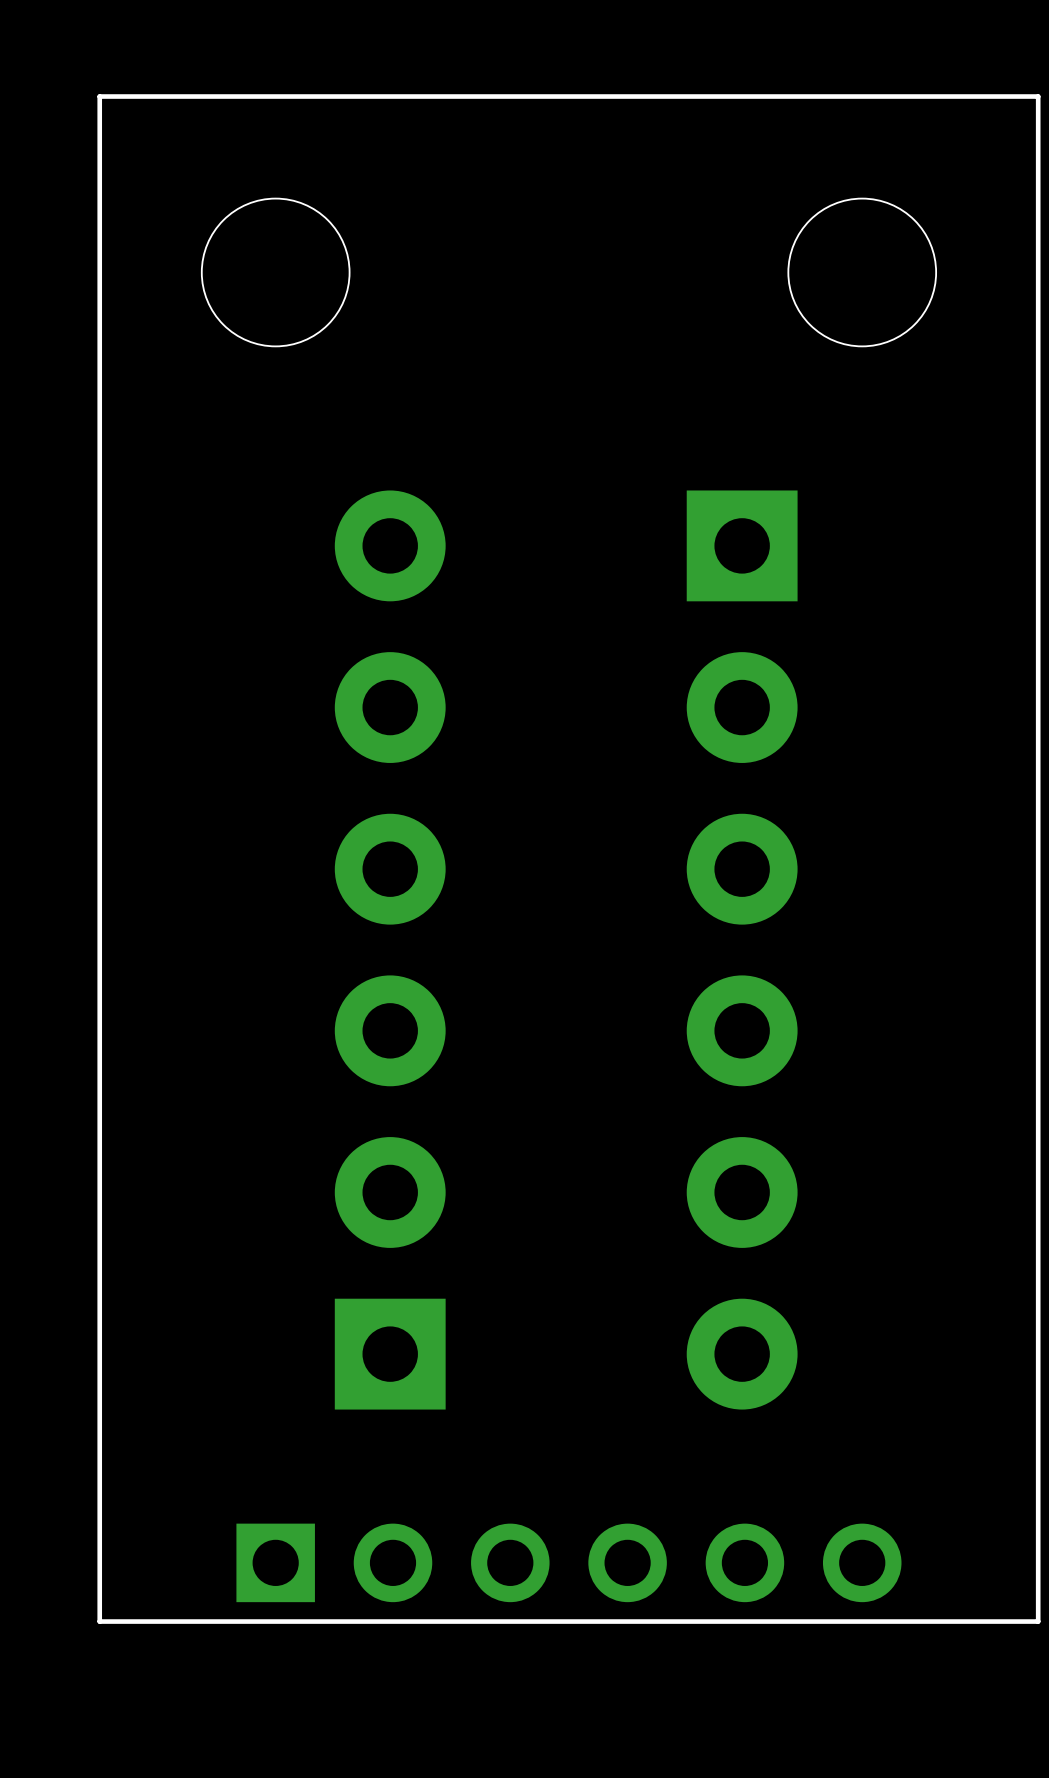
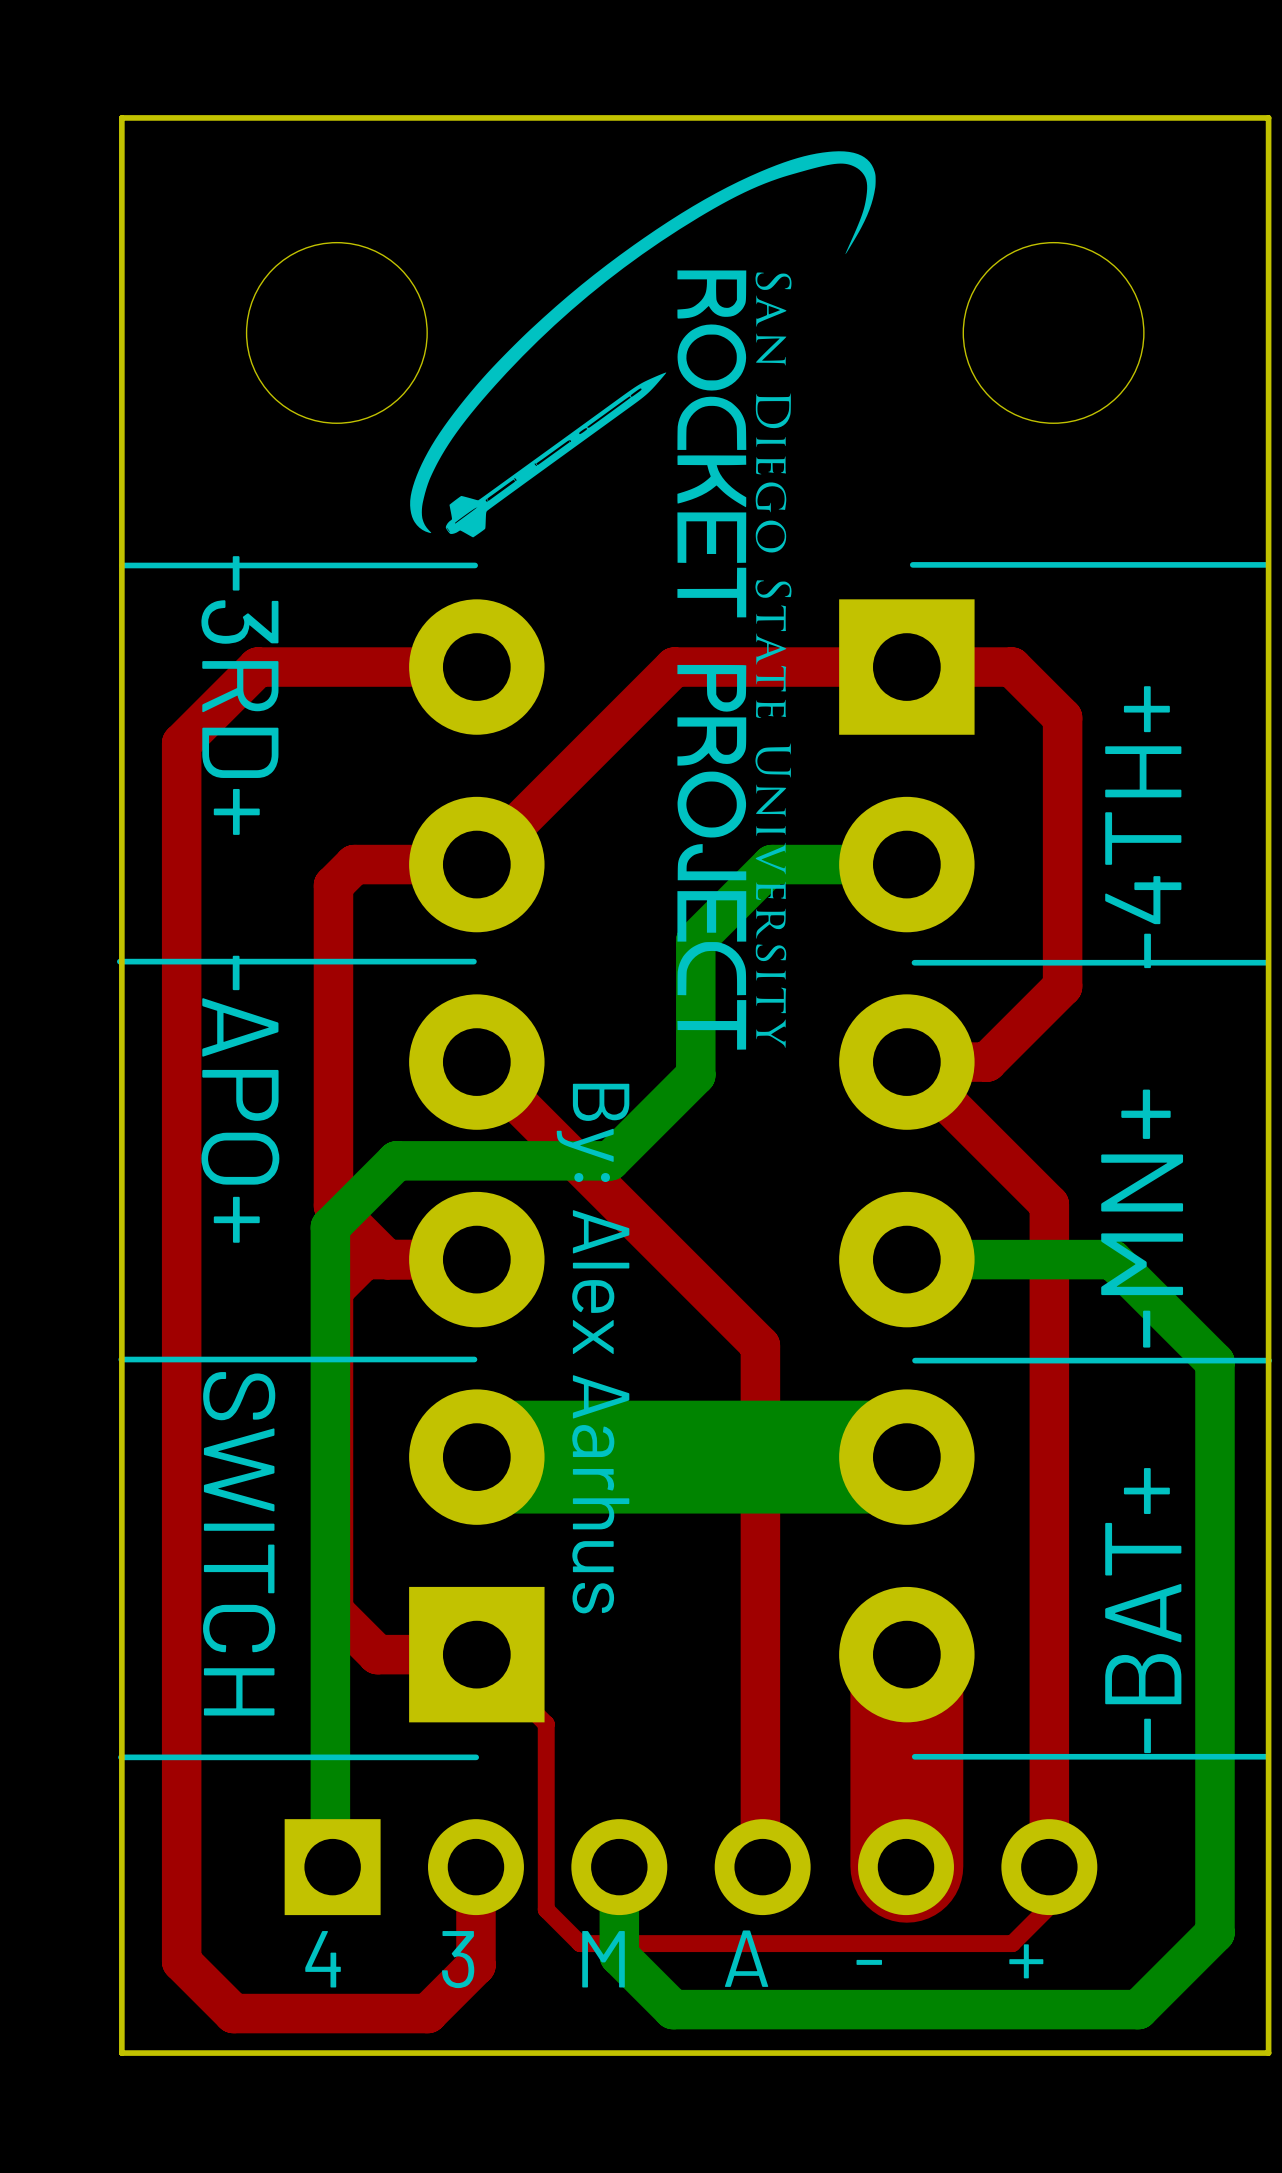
drawing: none -> [410, 151, 876, 1050]
line: none -> (475, 565) (121, 565)
line: none -> (1268, 564) (912, 564)
top track: none -> (476, 667) (257, 667) (181, 743) (181, 1961) (233, 2013) (427, 2013) (475, 1965) (475, 1867)
text: none -> -3RD+ (239, 695)
text: none -> -4TH+ (1143, 827)
bottom track: none -> (906, 864) (771, 864) (695, 940) (695, 1075) (610, 1160) (396, 1160) (330, 1227) (330, 1864) (332, 1867)
line: none -> (473, 961) (119, 961)
line: none -> (1267, 962) (914, 962)
top track: none -> (476, 1062) (760, 1345) (760, 1864) (762, 1867)
text: none -> -MN+ (1142, 1218)
text: none -> -APO+ (240, 1099)
top track: none -> (476, 1259) (364, 1259) (333, 1290) (333, 1610) (377, 1654) (476, 1654) (546, 1724) (546, 1909) (580, 1943) (1012, 1943) (1049, 1906) (1049, 1204) (906, 1062) (986, 1062) (1062, 986) (1062, 717) (1011, 667) (674, 667) (476, 864) (354, 864) (333, 885) (333, 1205) (387, 1259)
bottom track: none -> (906, 1259) (1112, 1259) (1214, 1362) (1214, 1932) (1138, 2009) (673, 2009) (619, 1955) (619, 1867)
line: none -> (474, 1359) (121, 1359)
line: none -> (1269, 1360) (915, 1360)
text: none -> By: Alex Aarhus (593, 1348)
bottom track: none -> (906, 1457) (476, 1457)
text: none -> -BAT+ (1143, 1610)
text: none -> SWITCH (239, 1543)
top track: none -> (906, 1654) (906, 1867)
line: none -> (1267, 1756) (914, 1756)
line: none -> (476, 1757) (120, 1757)
part position: (568, 1562) -> (690, 1867)
text: none -> 4 (323, 1959)
text: none -> A (746, 1958)
text: none -> 3 (458, 1959)
text: none -> M (603, 1959)
text: none -> - (869, 1962)
text: none -> + (1026, 1961)
board edge: (1038, 1621) (99, 1621) -> (1268, 1981) (1268, 2053) (121, 2053) (121, 1981)

